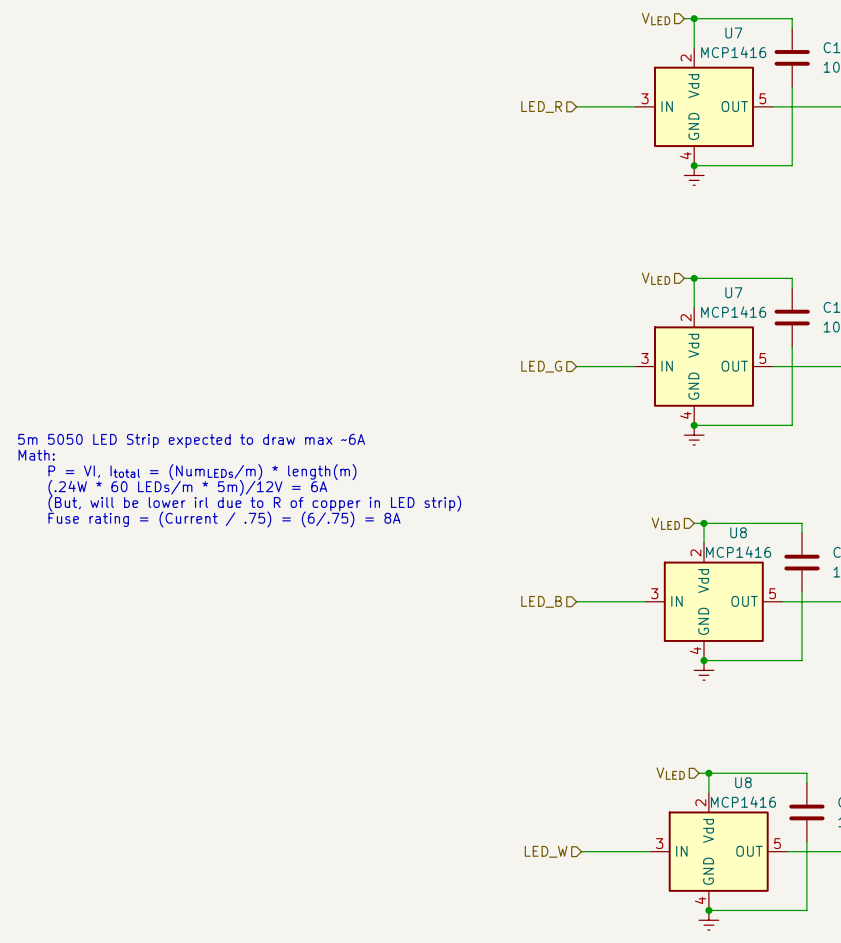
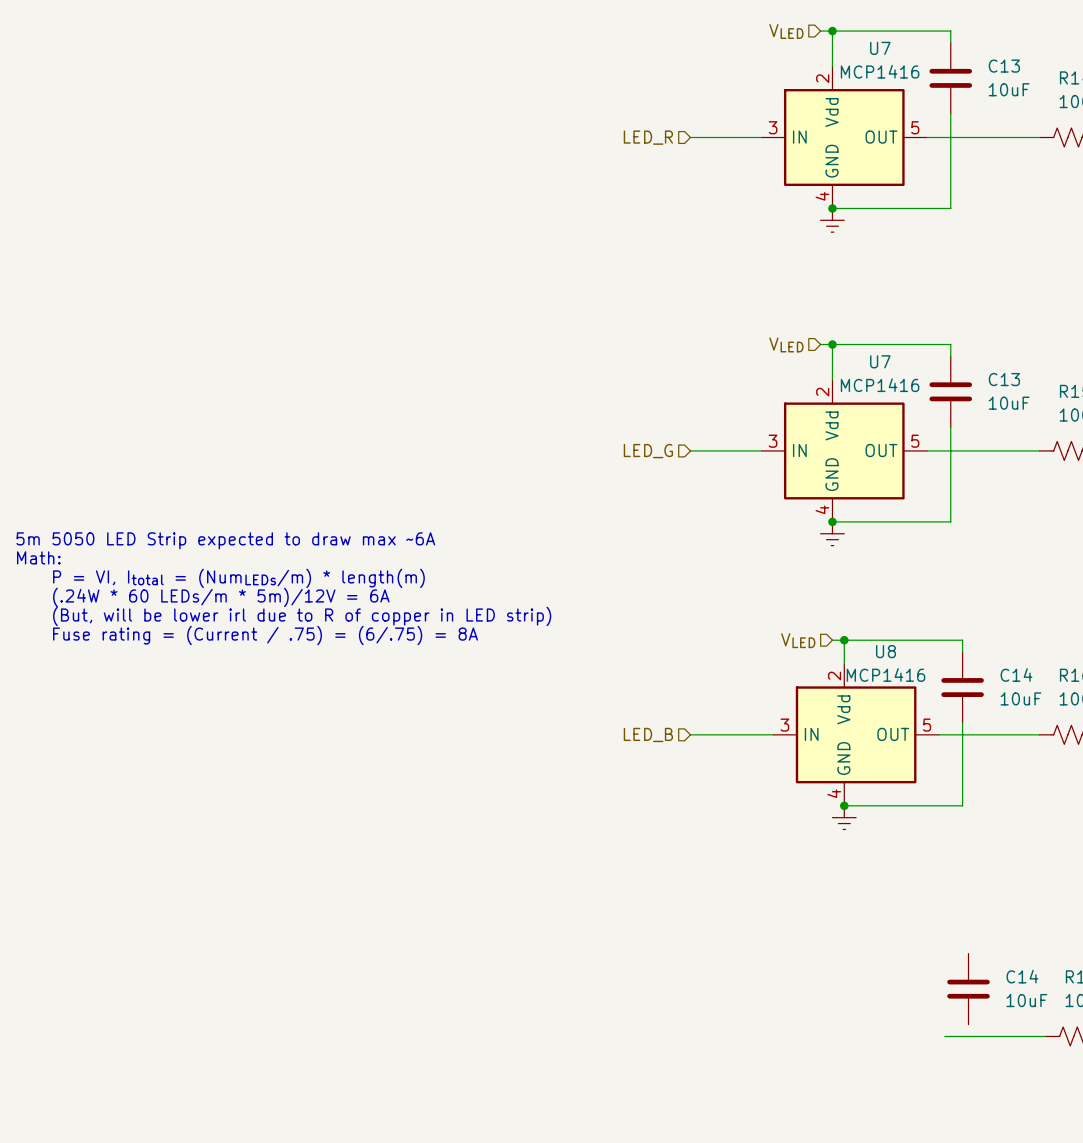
hierarchical label: VLED (670, 773) -> none
wire: (699, 773) (806, 773) (806, 783) -> none
wire: (708, 773) (708, 792) -> none
junction: (708, 773) -> none
wire: (806, 841) (806, 910) (708, 910) -> none
hierarchical label: LED_W (546, 851) -> none
wire: (581, 851) (650, 851) -> none
U8: MCP1416 (718, 851) -> none
junction: (708, 910) -> none
power symbol: (708, 920) -> none

